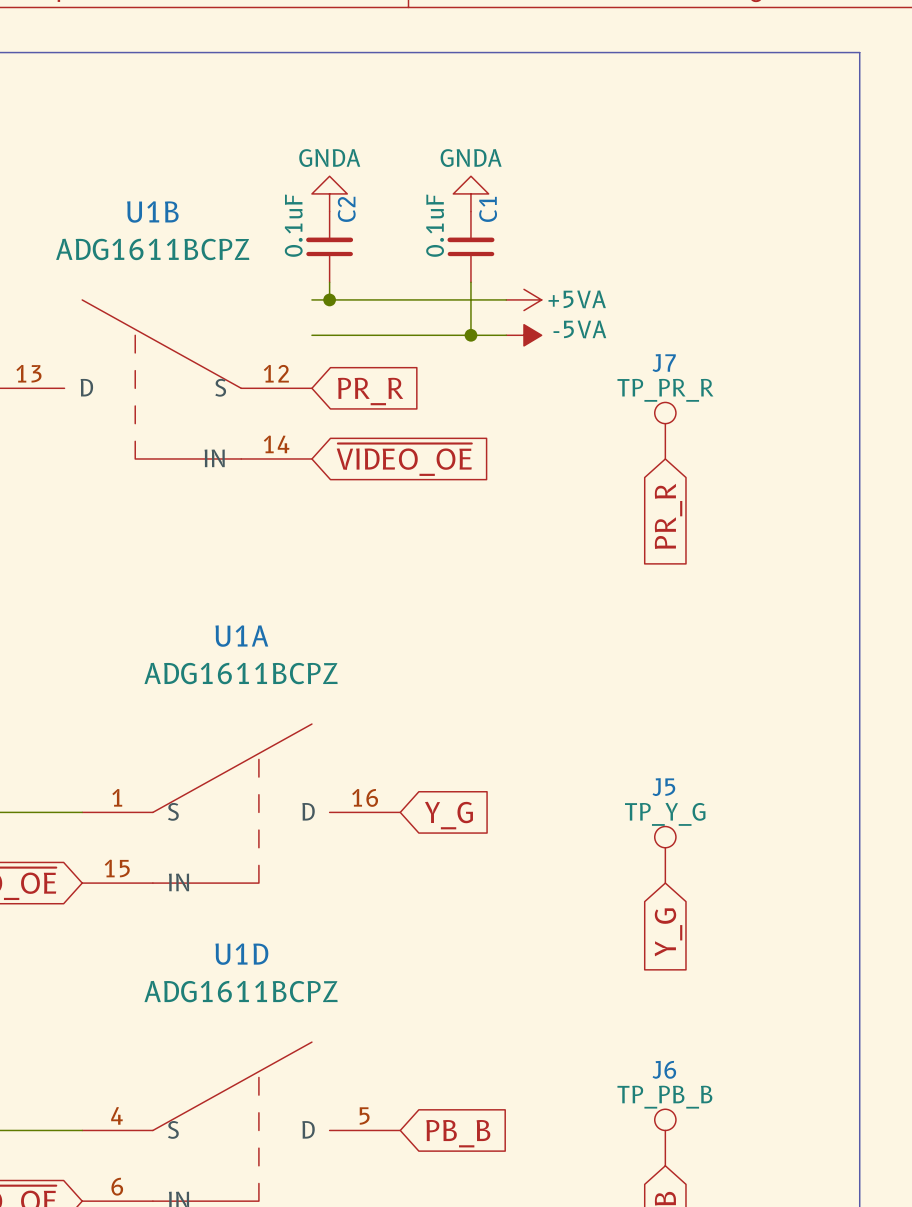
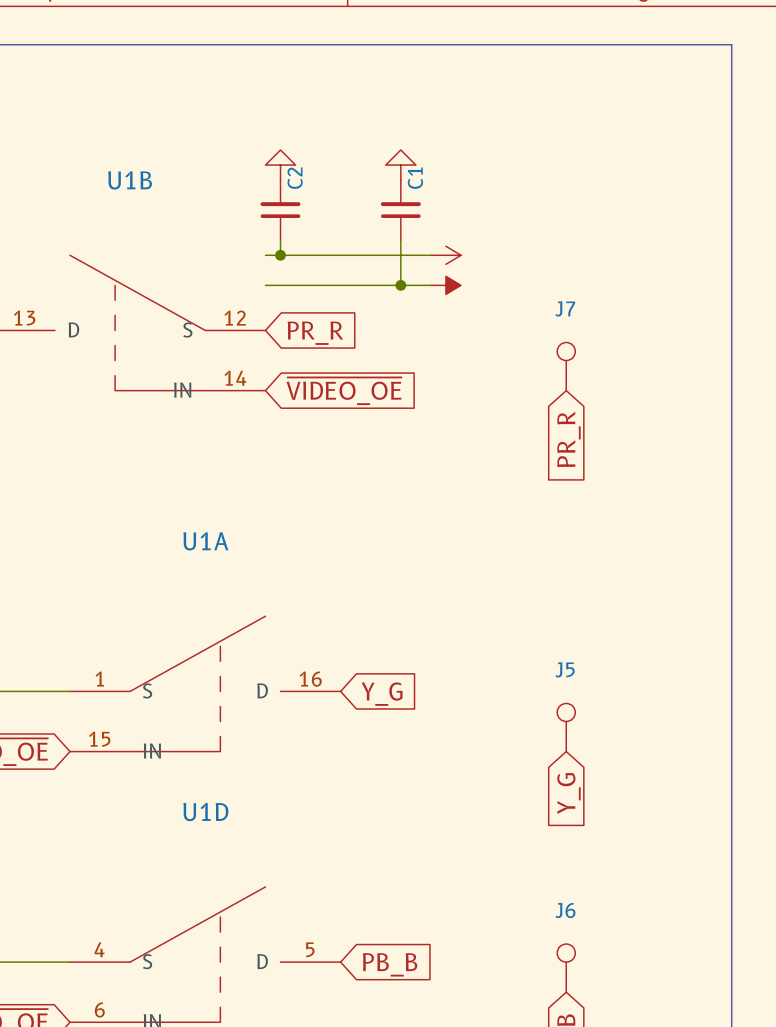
power symbol text: GNDA (329, 158) -> none
power symbol text: GNDA (471, 158) -> none
C2 value: 0.1uF (293, 225) -> none
C1 value: 0.1uF (435, 225) -> none
U1B value: ADG1611BCPZ (152, 249) -> none
power symbol text: +5VA (577, 299) -> none
power symbol text: -5VA (579, 329) -> none
J7 value: TP_PR_R (665, 390) -> none
U1A value: ADG1611BCPZ (241, 673) -> none
J5 value: TP_Y_G (665, 814) -> none
U1D value: ADG1611BCPZ (241, 991) -> none
J6 value: TP_PB_B (664, 1097) -> none

